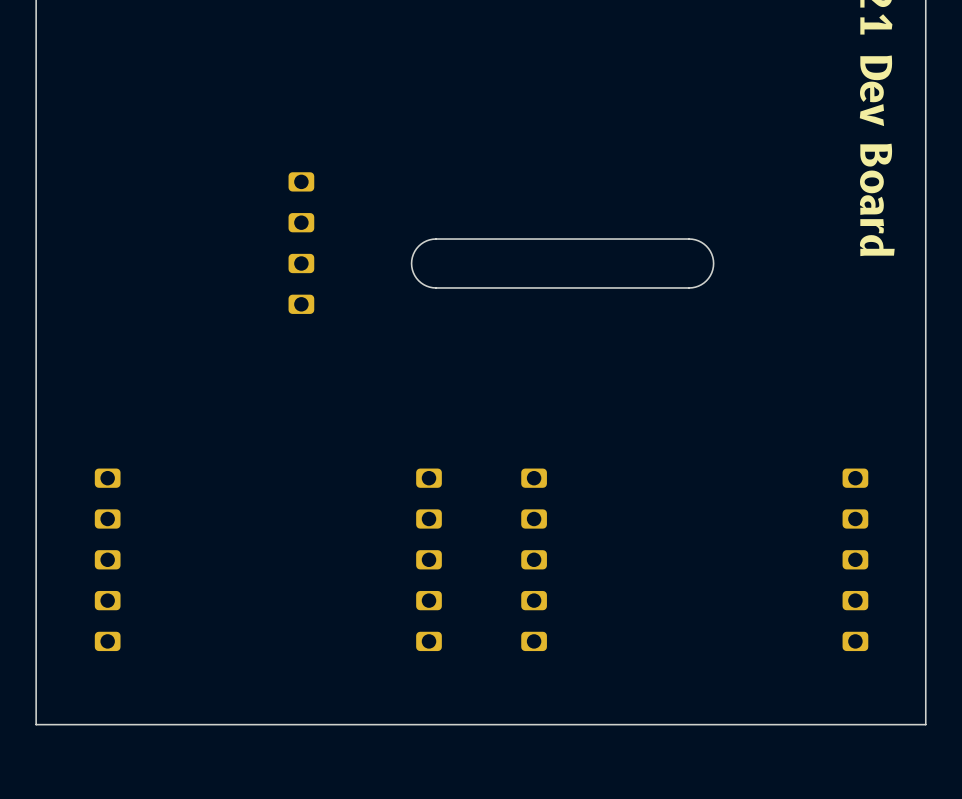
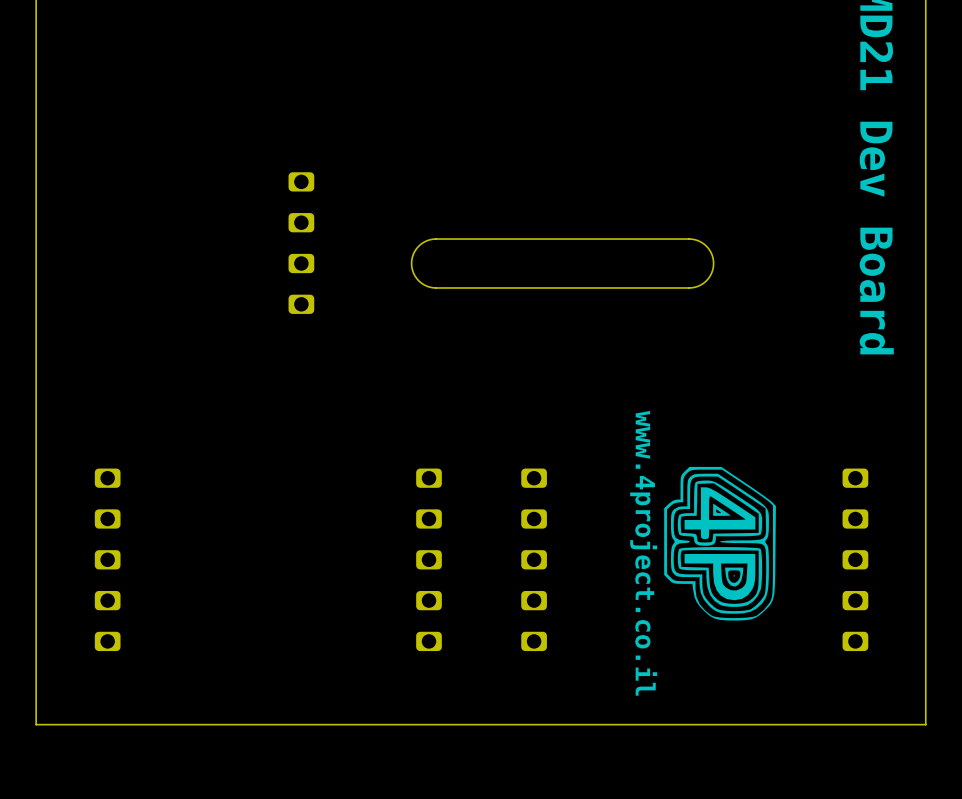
drawing: none -> [664, 466, 776, 621]
text: none -> www.4project.co.il (643, 553)

